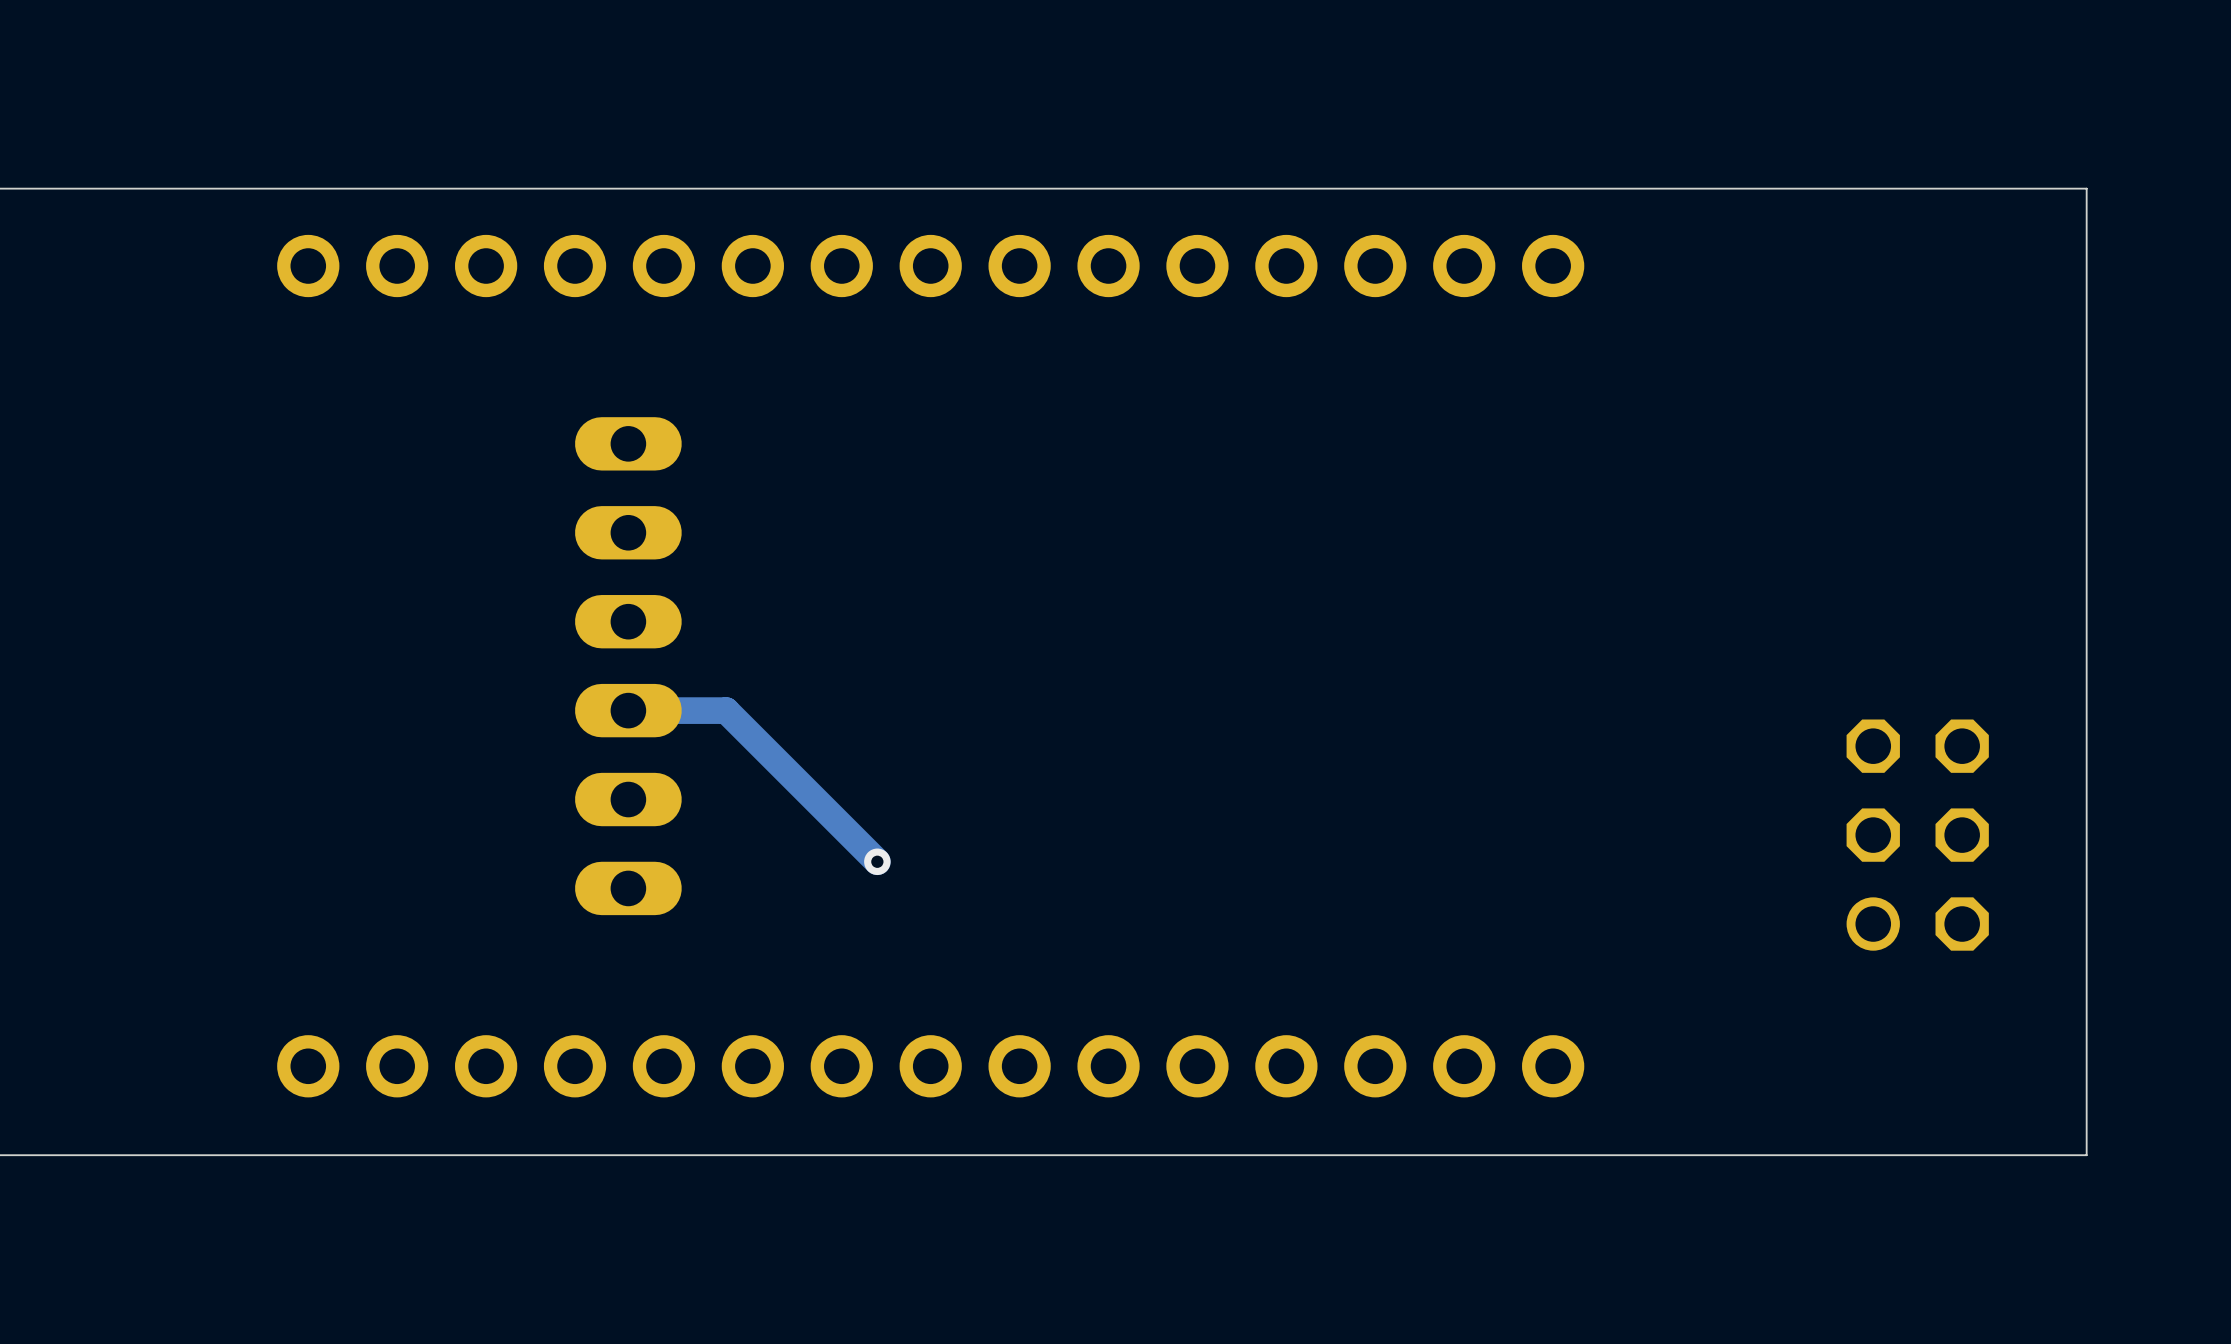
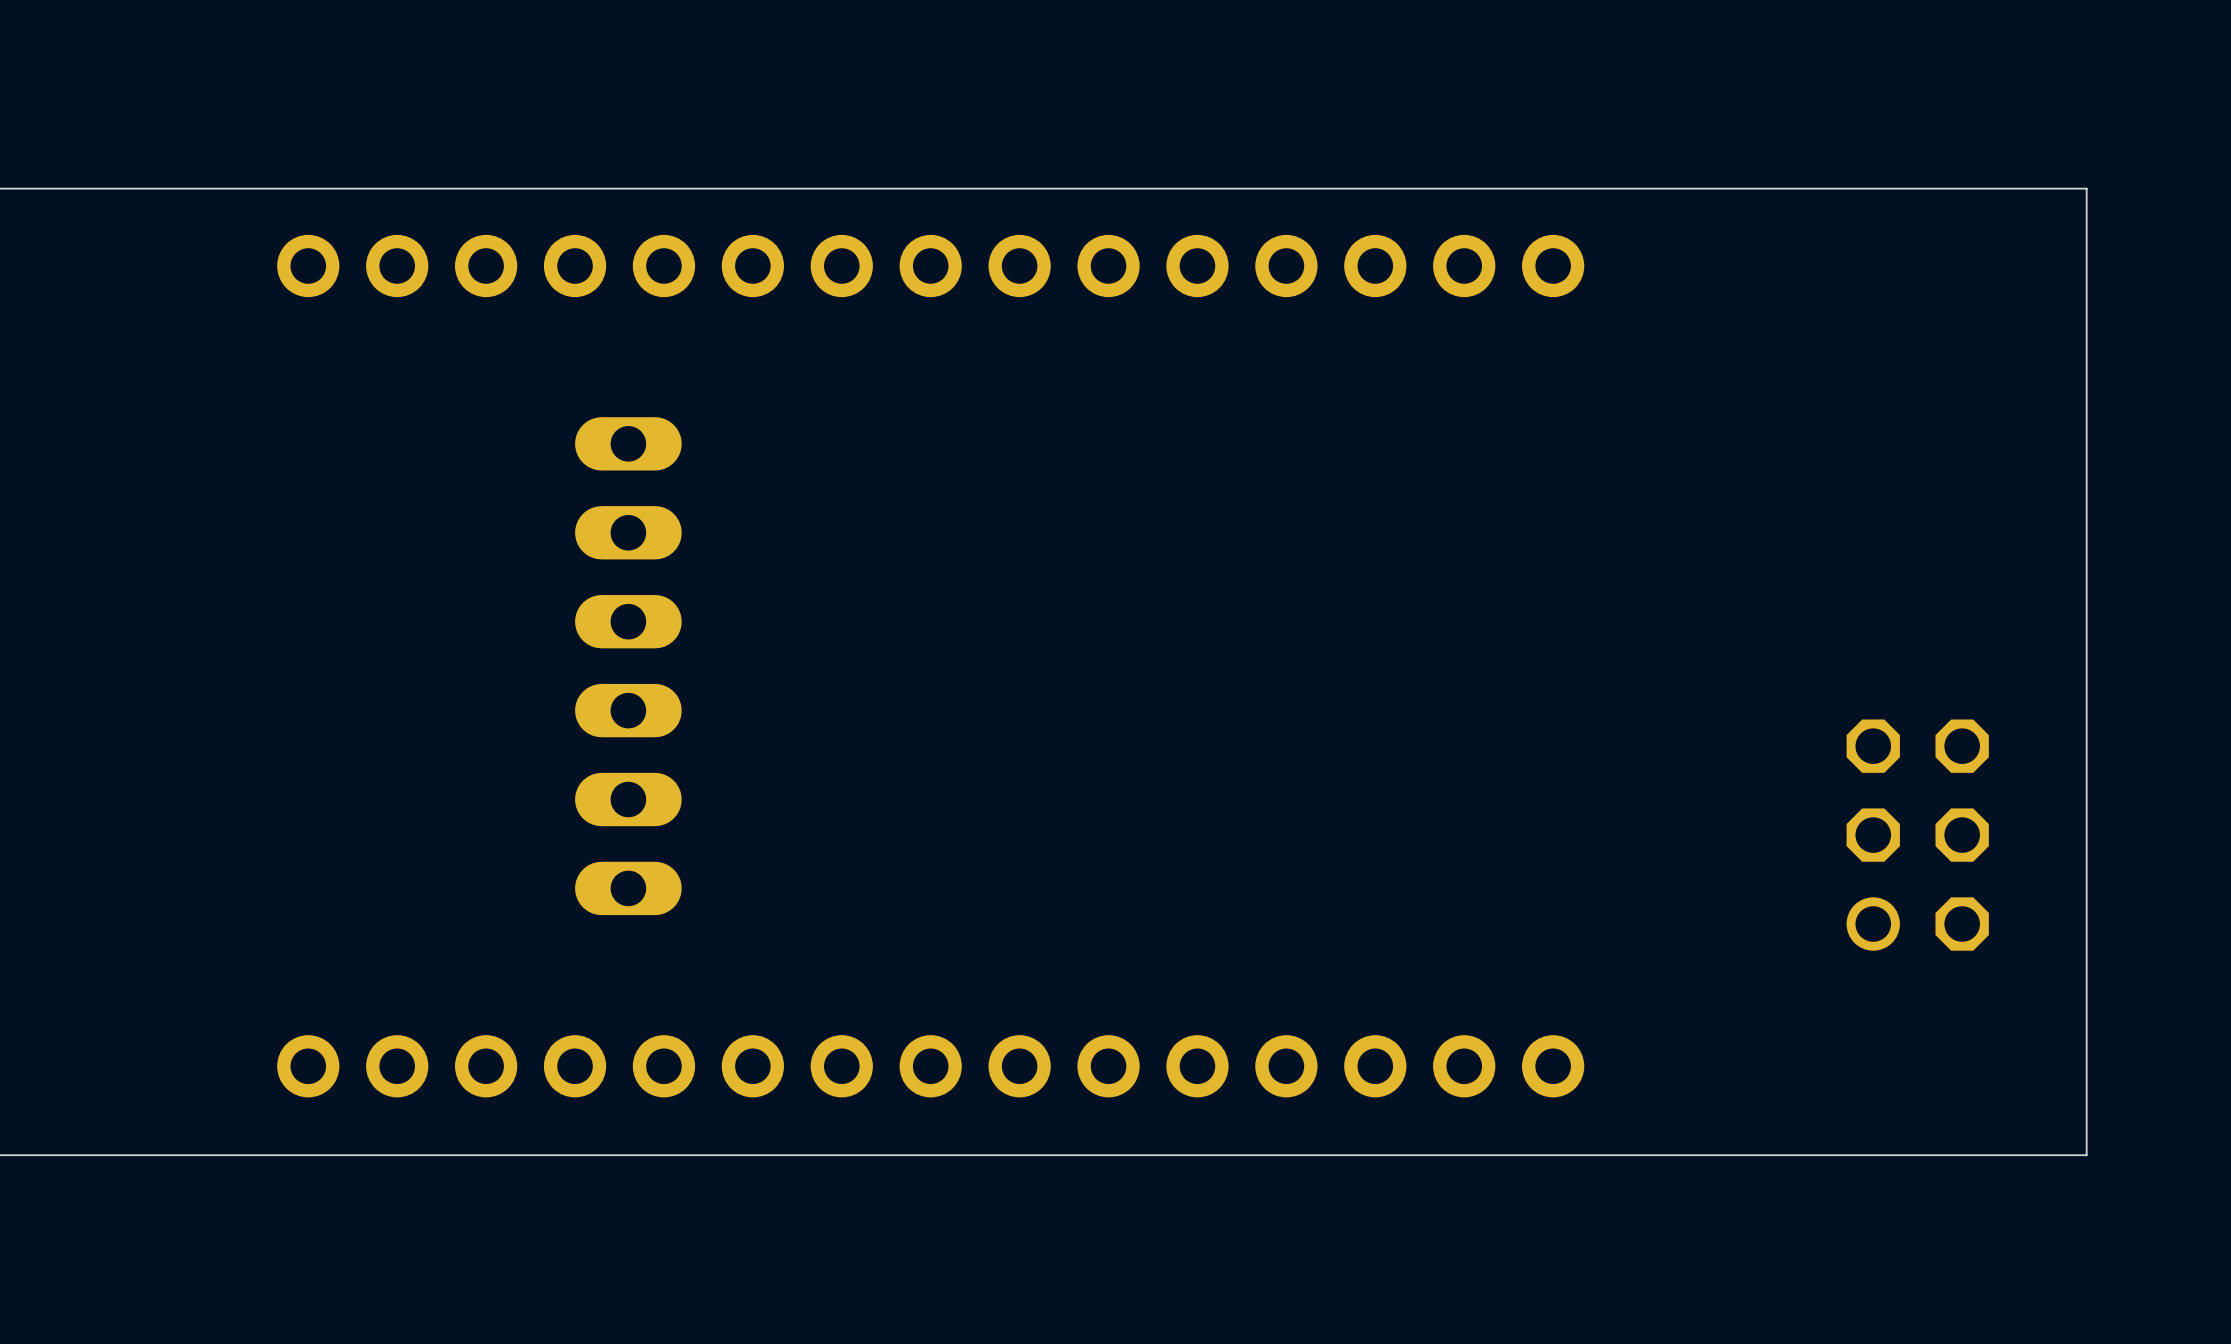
track: (628, 710) (726, 710) (877, 861) -> none
via: (877, 861) -> none

